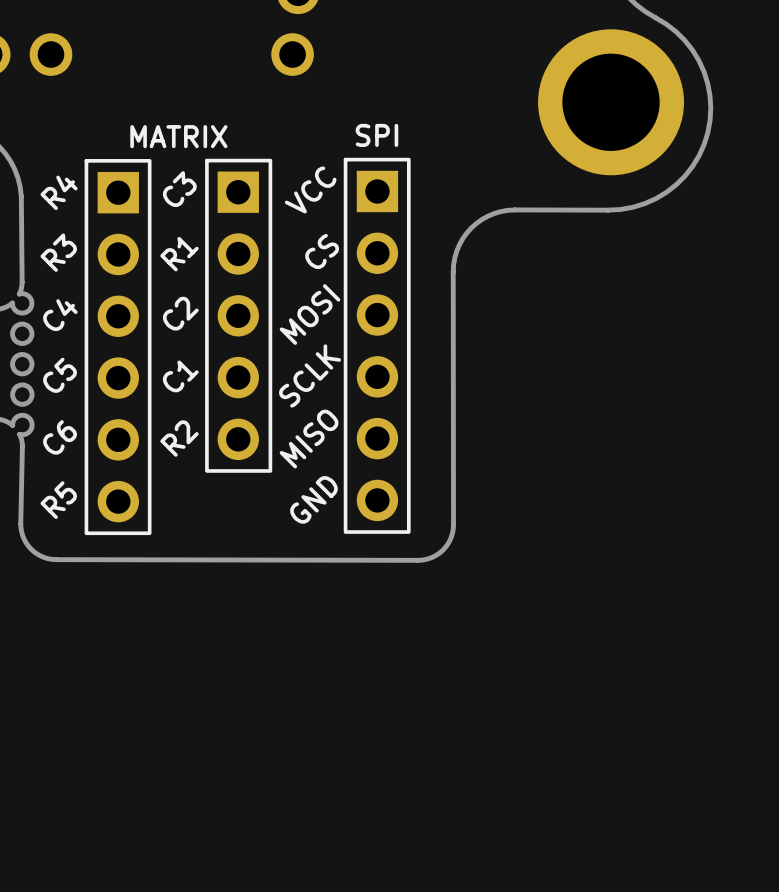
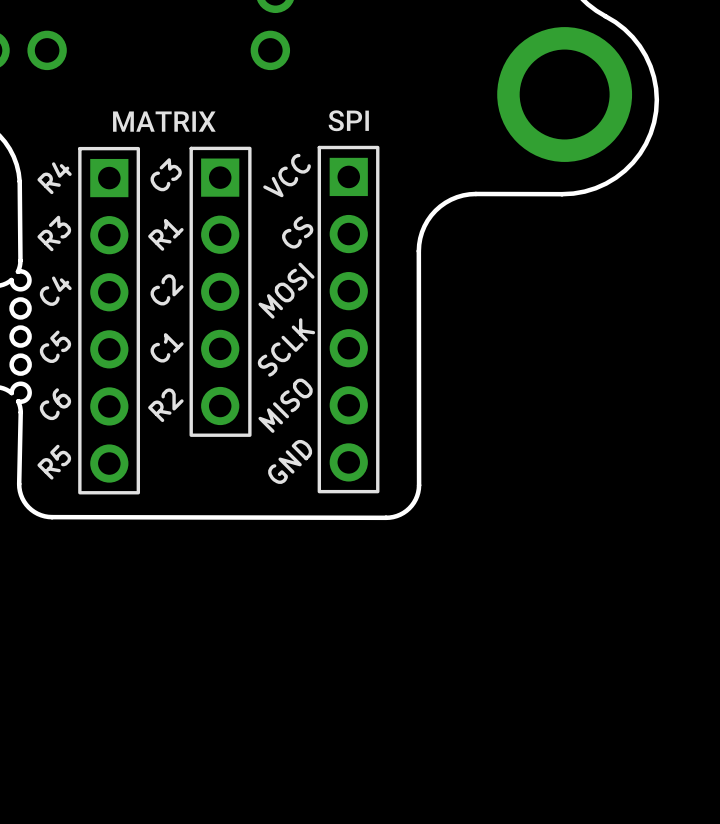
drawing: none -> [328, 110, 369, 132]
drawing: none -> [113, 111, 216, 132]
text: SPI (376, 135) -> none
text: MATRIX (178, 136) -> none

